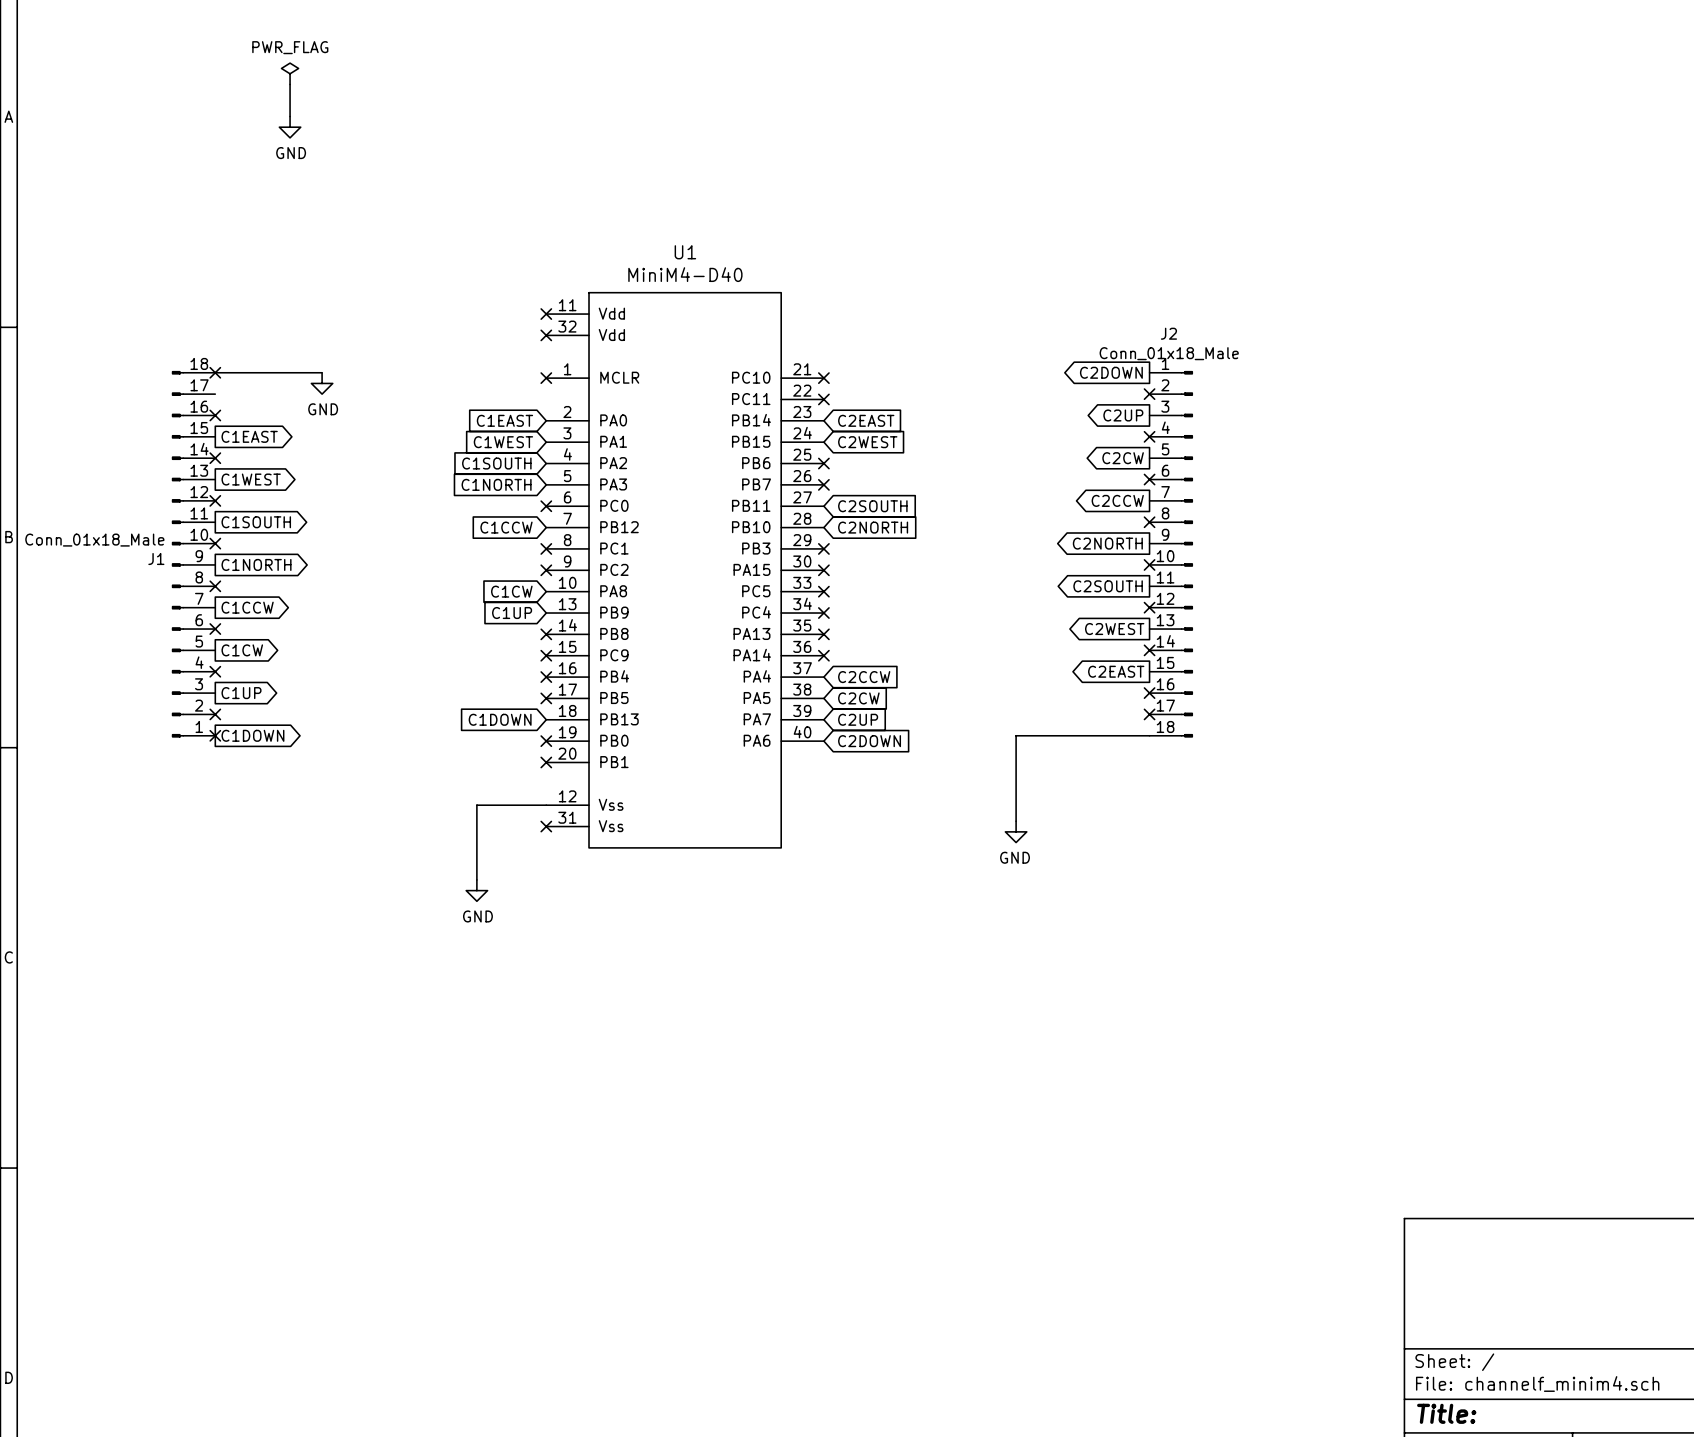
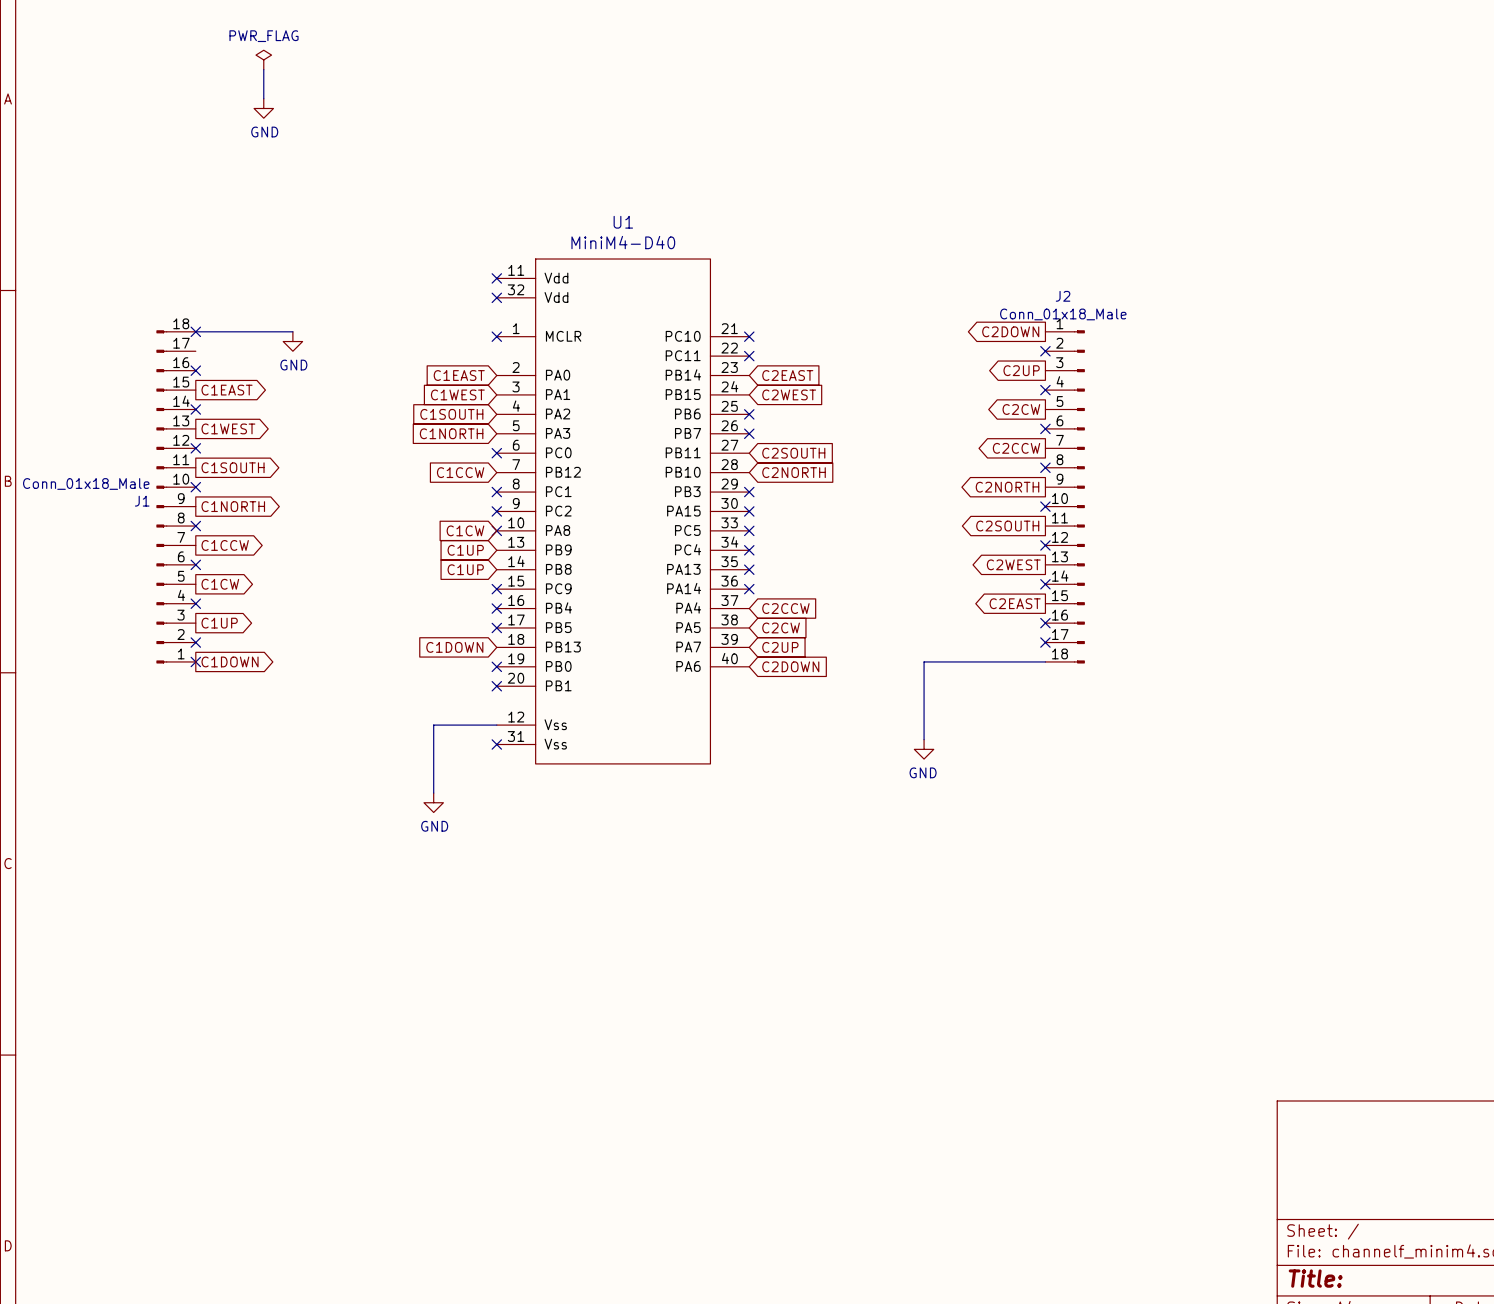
global label: none -> C1UP (465, 569)
no-connect mark position: (546, 634) -> (496, 530)

